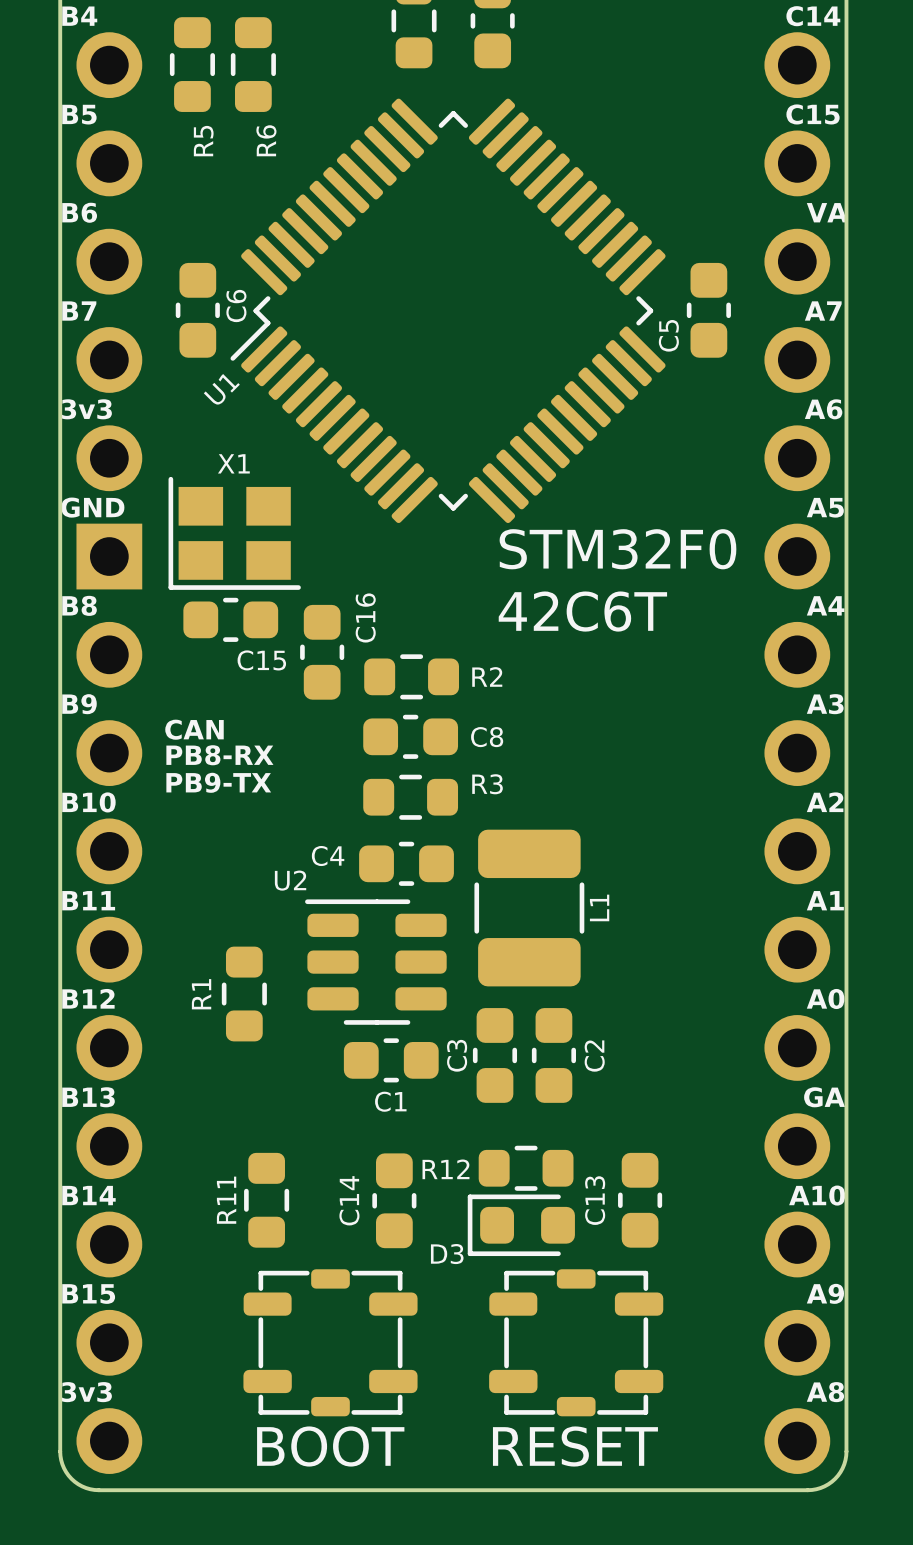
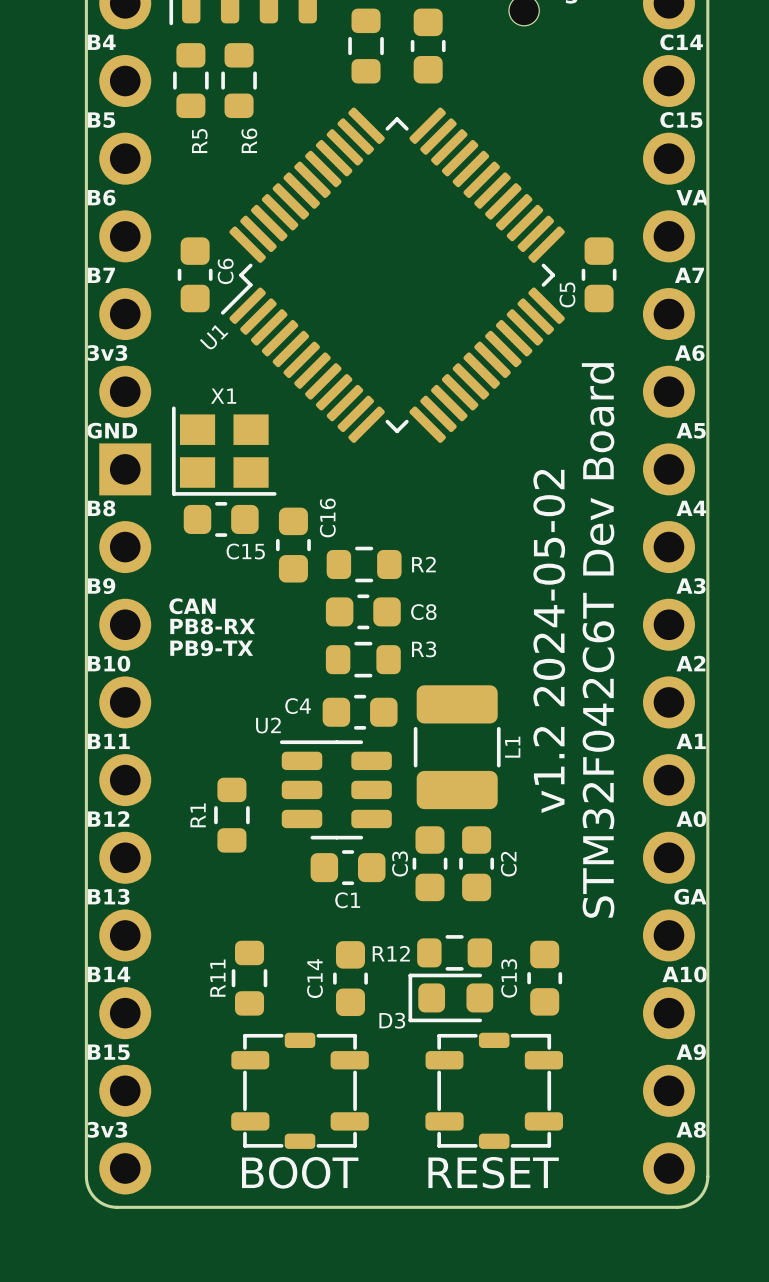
text: STM32F0 (617, 549) -> none
text: 42C6T (582, 611) -> none
text: none -> STM32F042C6T Dev Board (598, 640)
text: none -> v1.2 2024-05-02 (549, 641)

